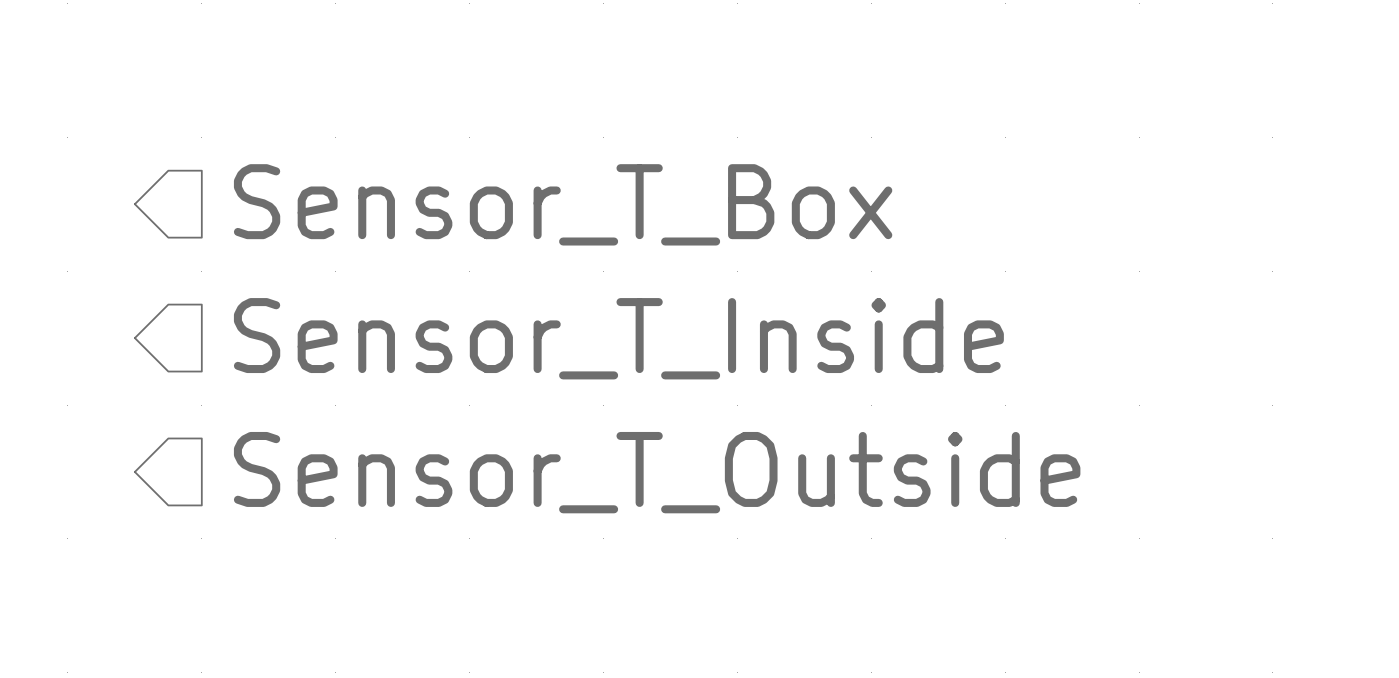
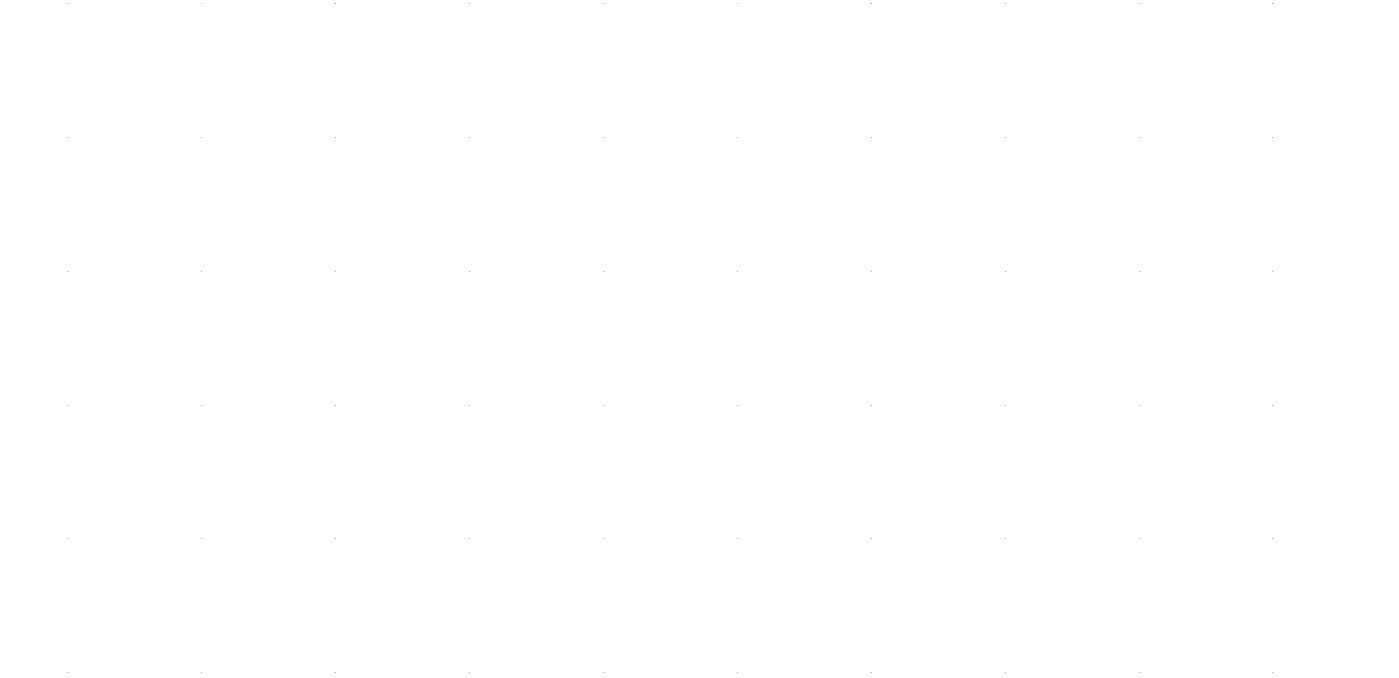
hierarchical label: Sensor_T_Box (563, 204) -> none
hierarchical label: Sensor_T_Inside (618, 338) -> none
hierarchical label: Sensor_T_Outside (657, 472) -> none

